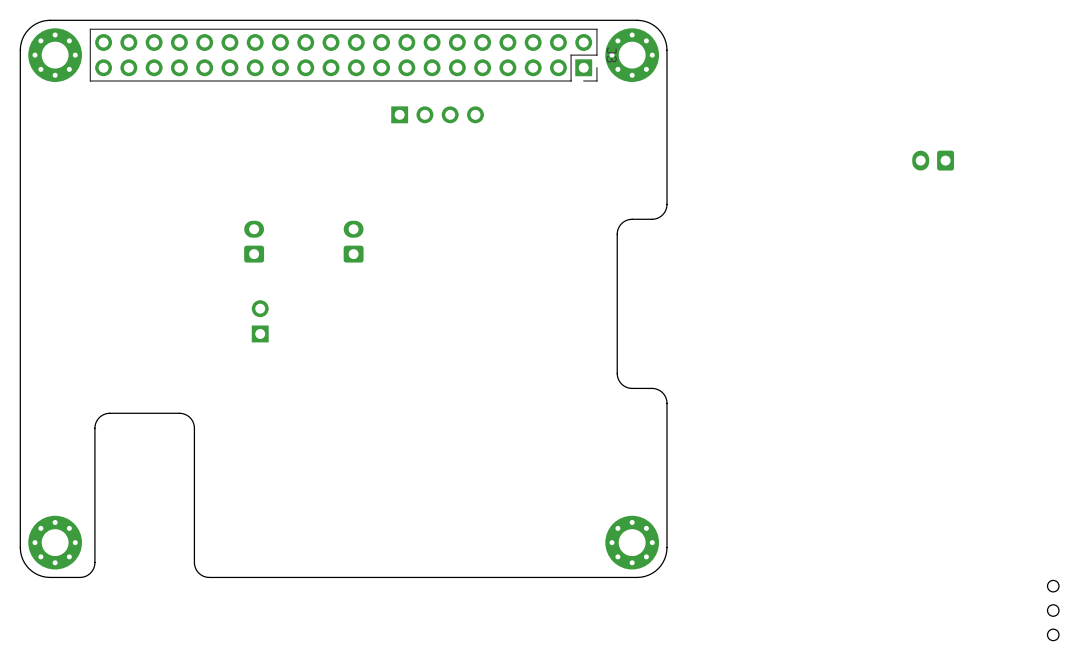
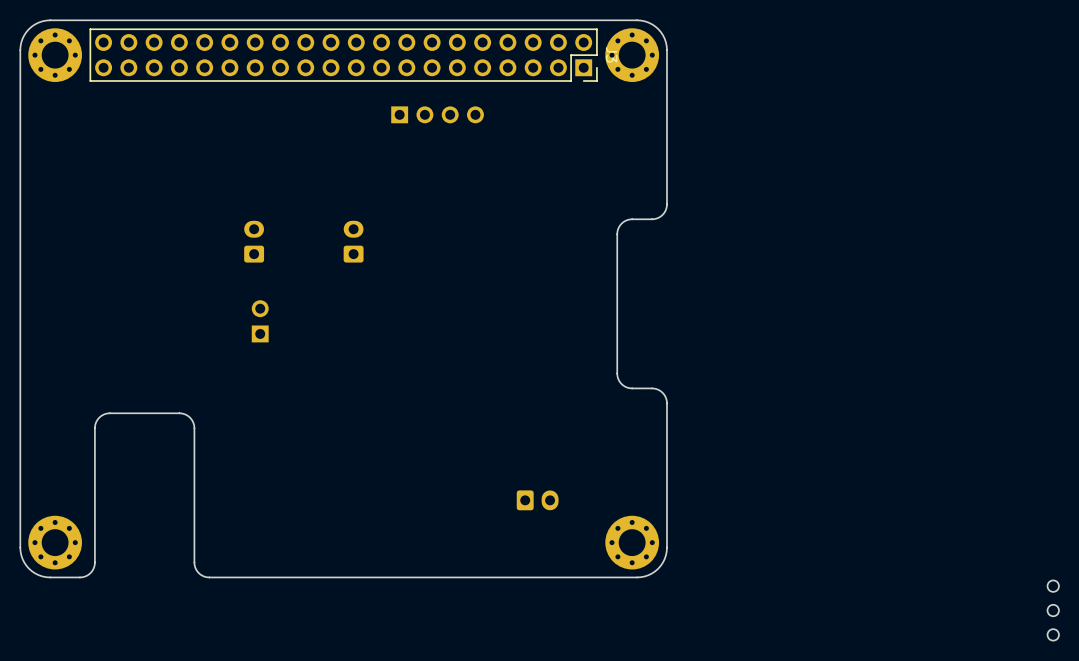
part: (933, 160) -> none
part: none -> (537, 500)

